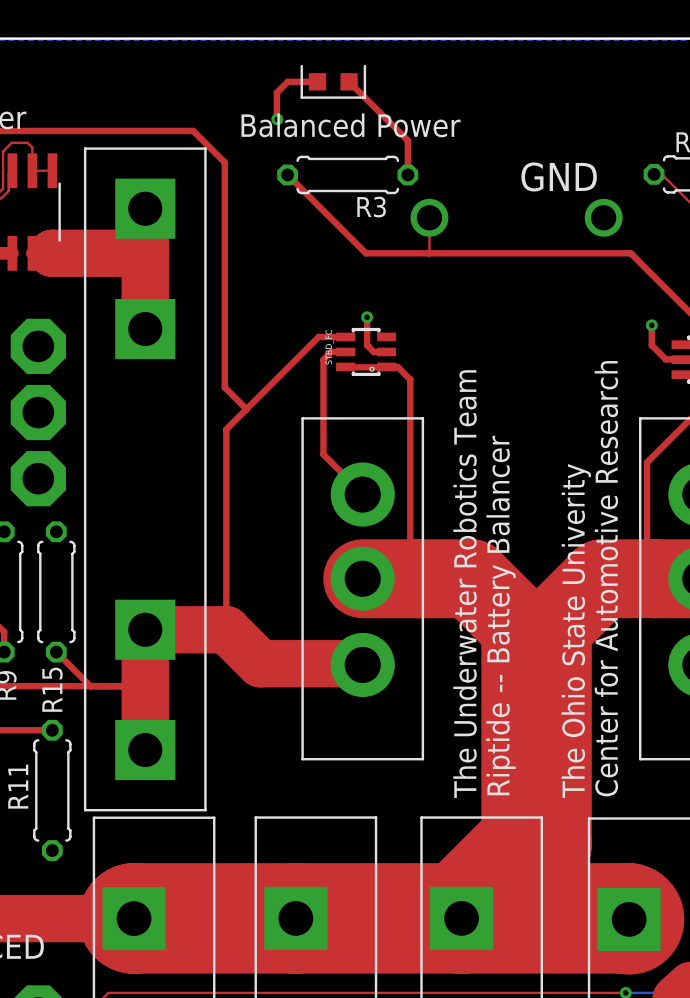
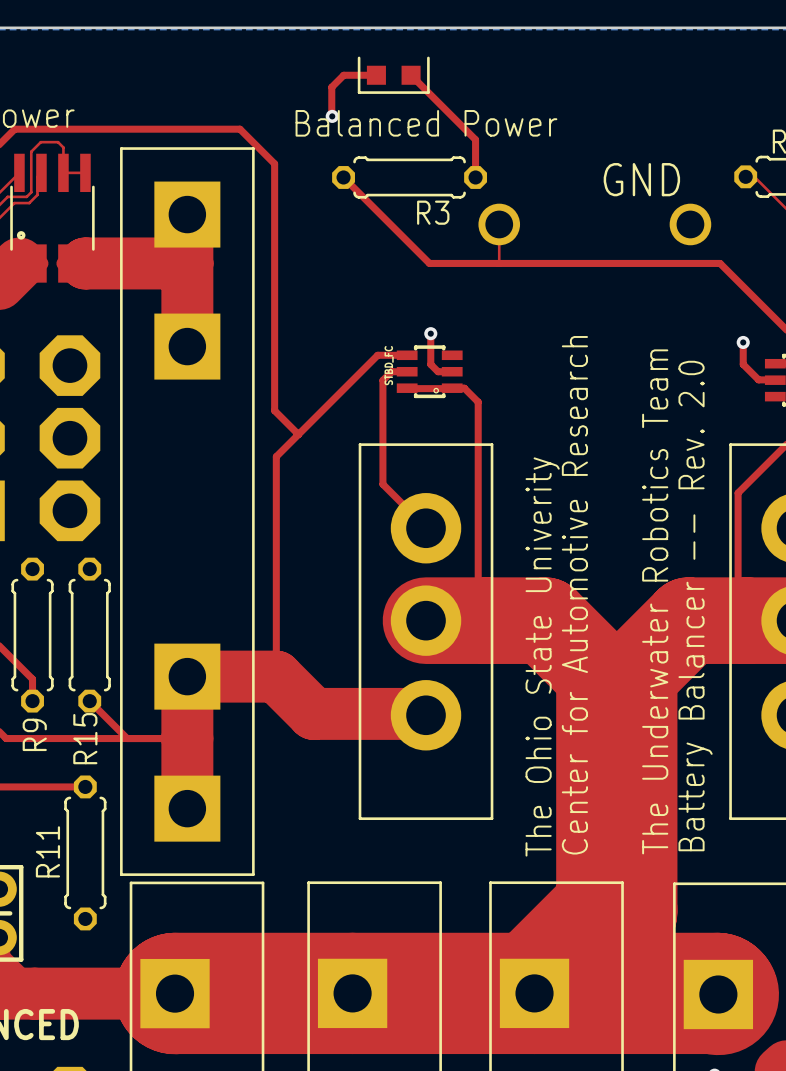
text position: Center for Automotive Research (606, 578) -> Center for Automotive Research (574, 595)
text position: The Underwater Robotics Team (465, 584) -> The Underwater Robotics Team (655, 601)
text: none -> Battery Balancer -- Rev. 2.0 (695, 606)
text: Riptide -- Battery Balancer (501, 615) -> none
text position: The Ohio State Univerity (576, 631) -> The Ohio State Univerity (542, 656)

